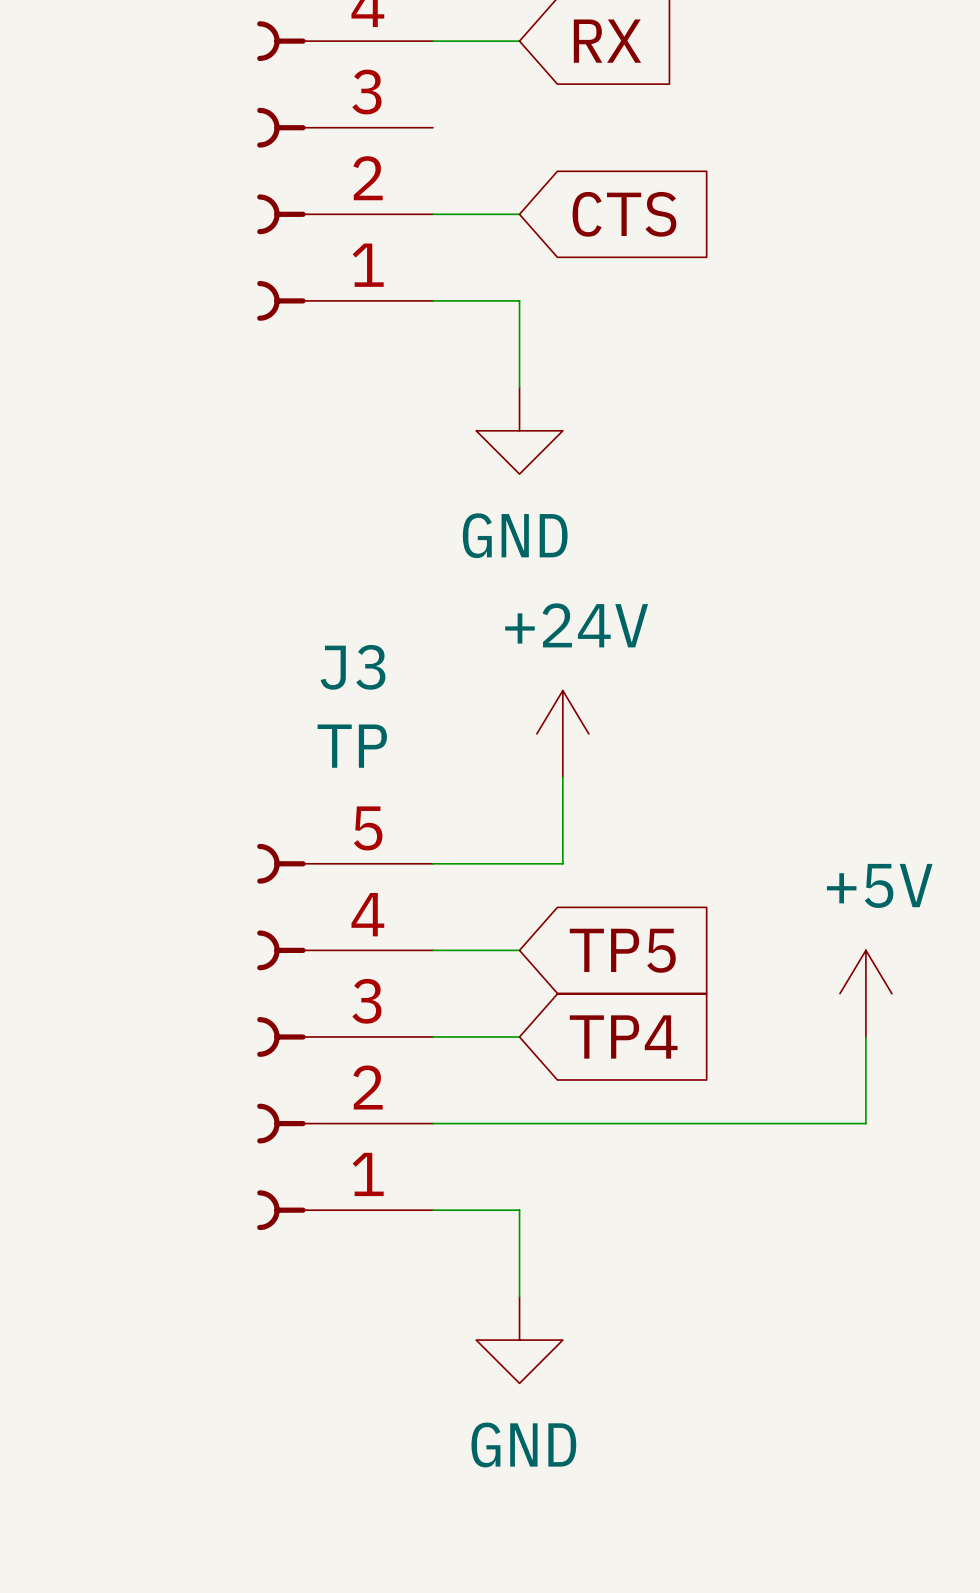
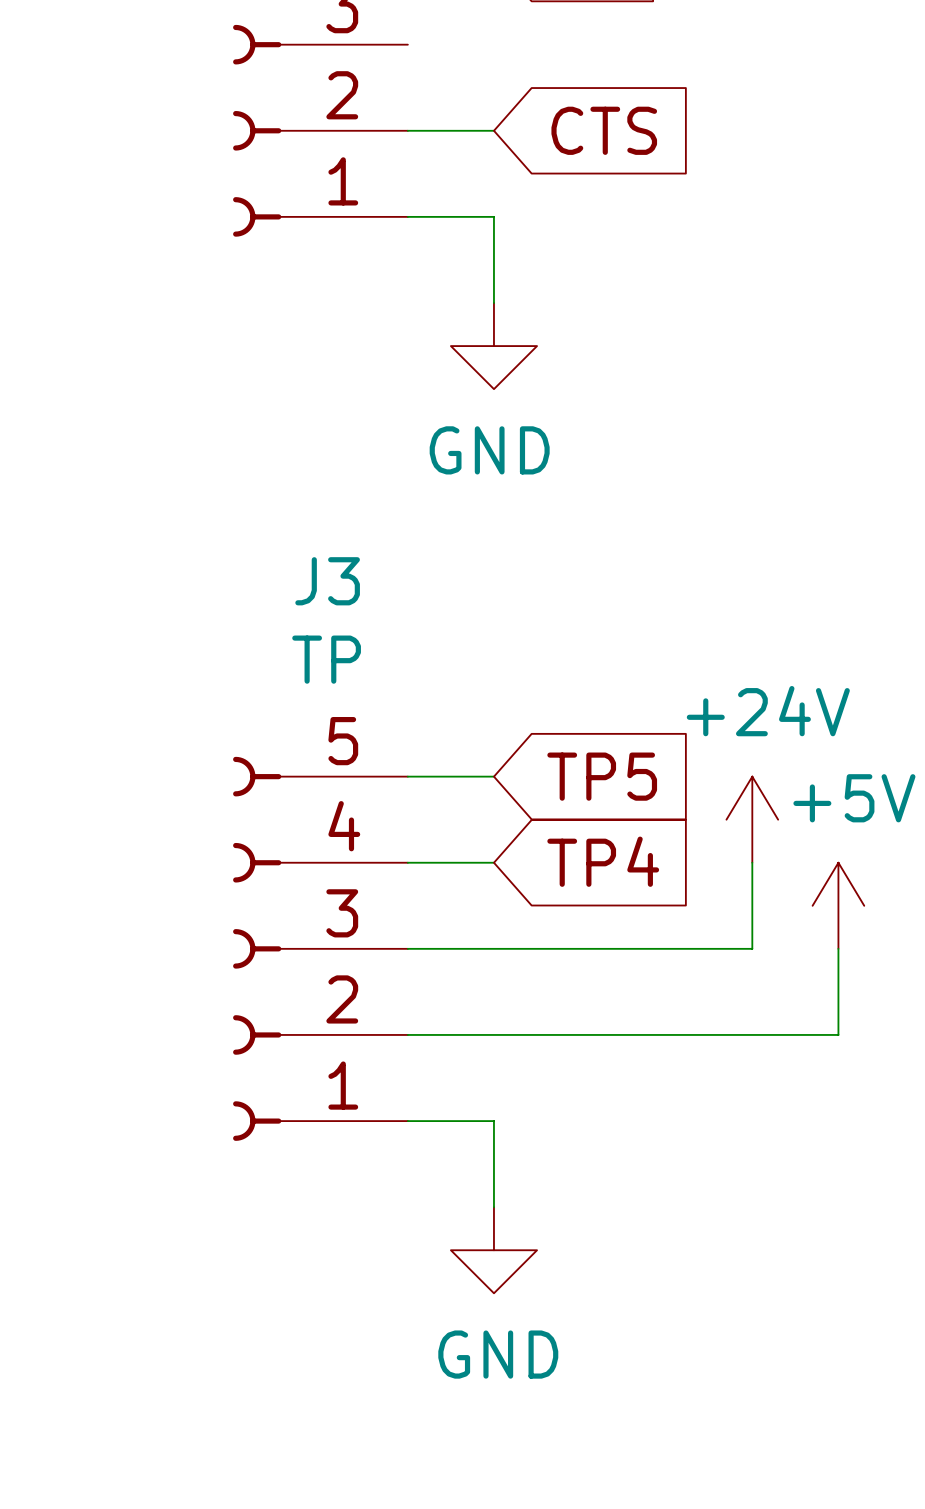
power symbol position: +24V (562, 733) -> +24V (752, 819)
wire: (562, 777) (562, 863) (519, 863) -> none
global label: none -> TP5 (602, 776)
global label: TP5 (622, 950) -> TP4 (603, 861)
wire: none -> (752, 862) (752, 948) (493, 948)
global label: TP4 (623, 1036) -> none

